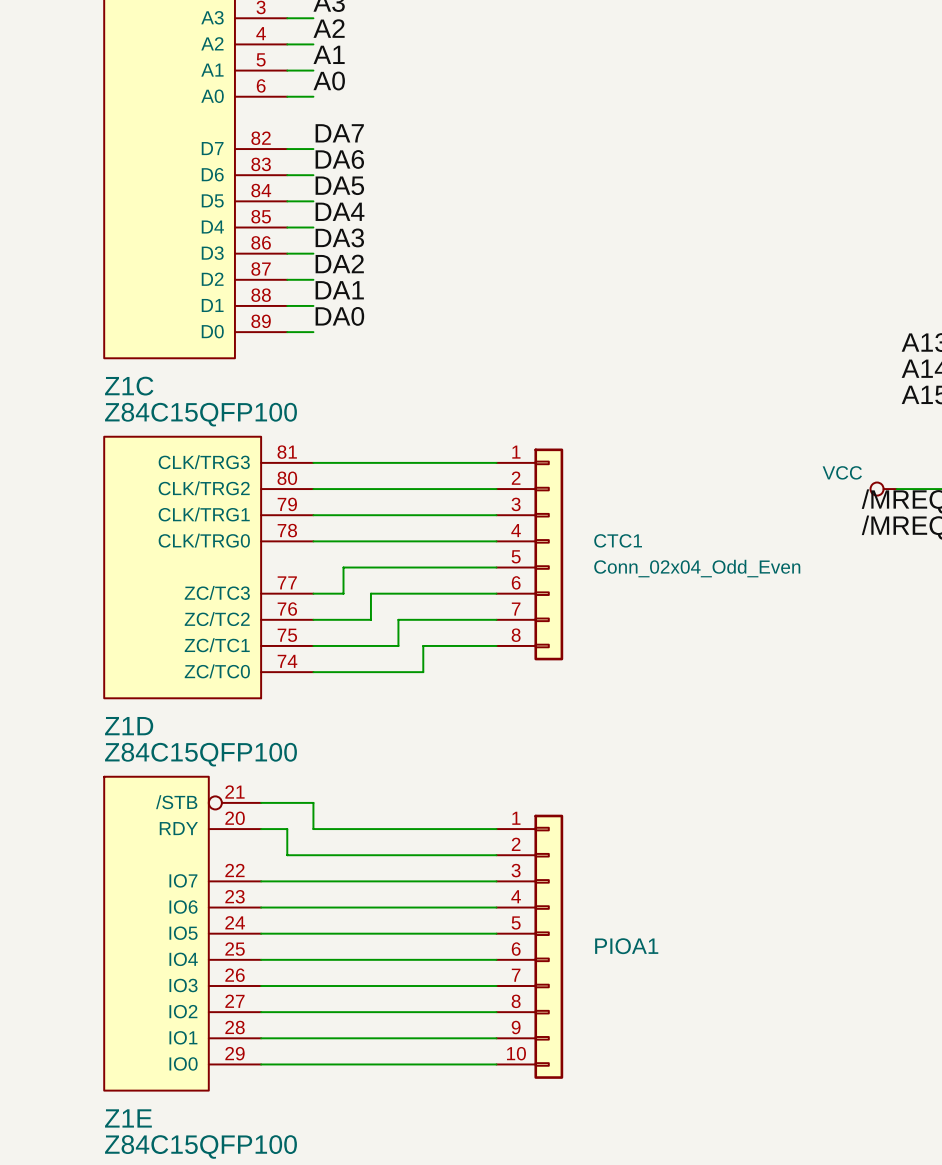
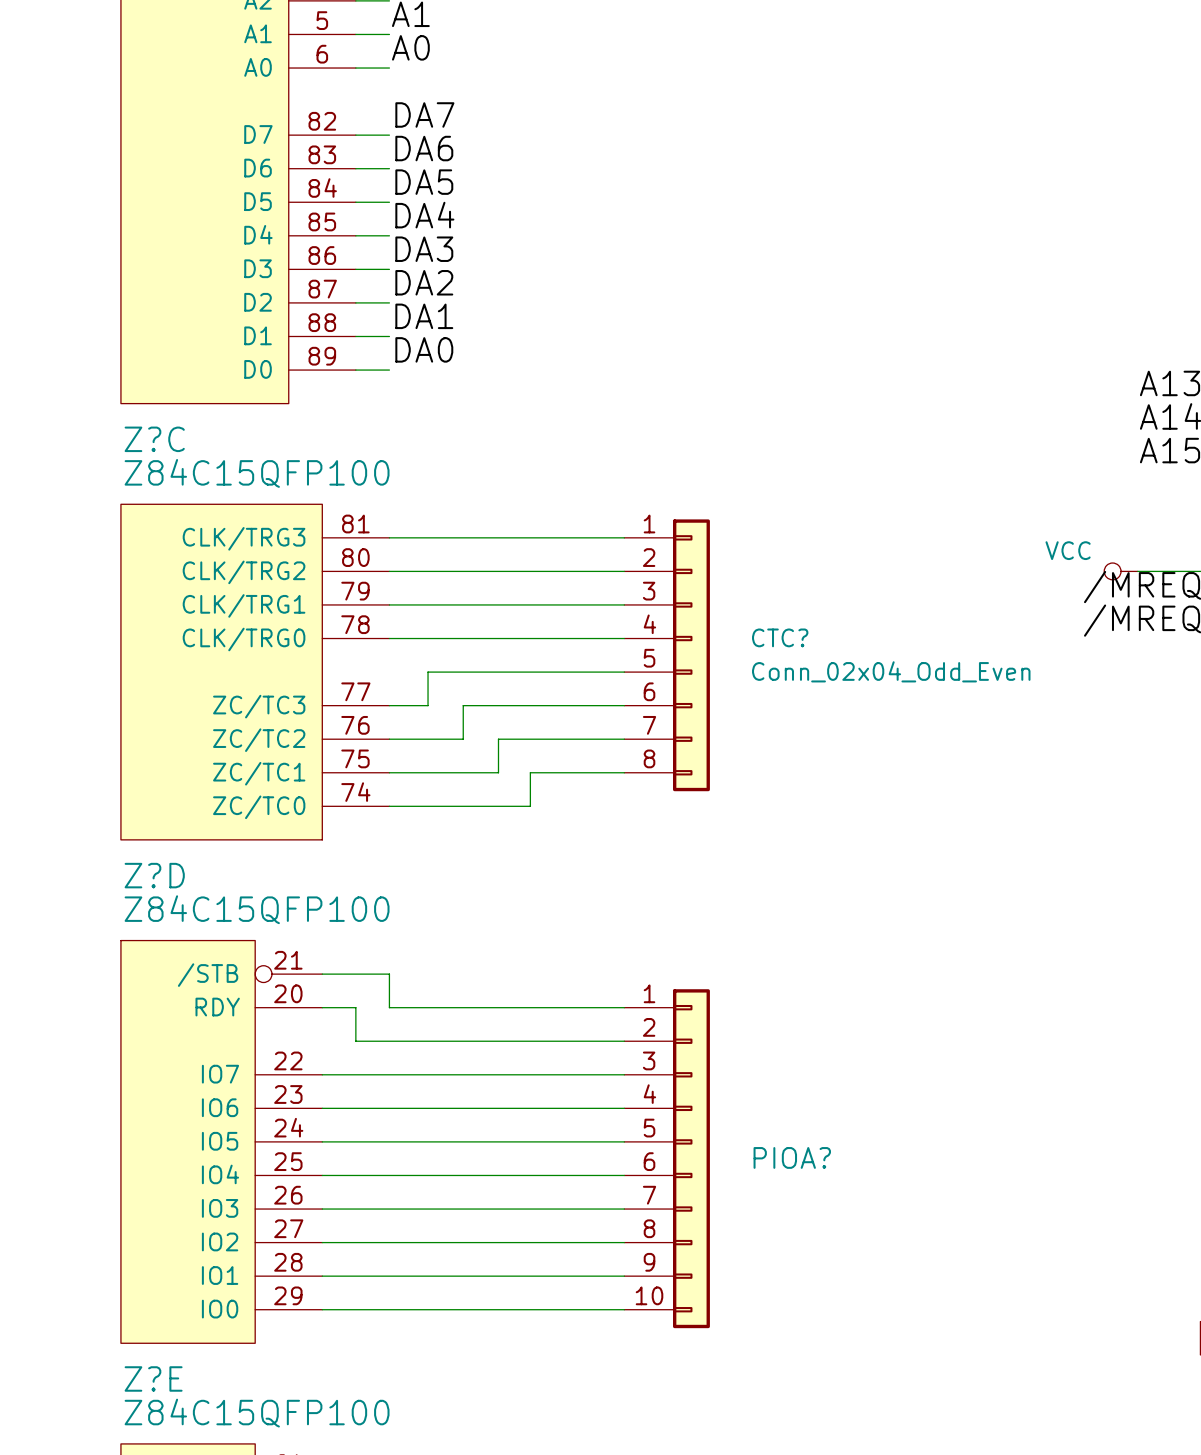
Z1C name: Z1C (129, 386) -> Z?C (154, 439)
CTC1 name: CTC1 (618, 540) -> CTC? (780, 637)
Z1D name: Z1D (129, 726) -> Z?D (154, 875)
PIOA1 name: PIOA1 (626, 946) -> PIOA? (792, 1157)
Z1E name: Z1E (128, 1118) -> Z?E (153, 1378)

